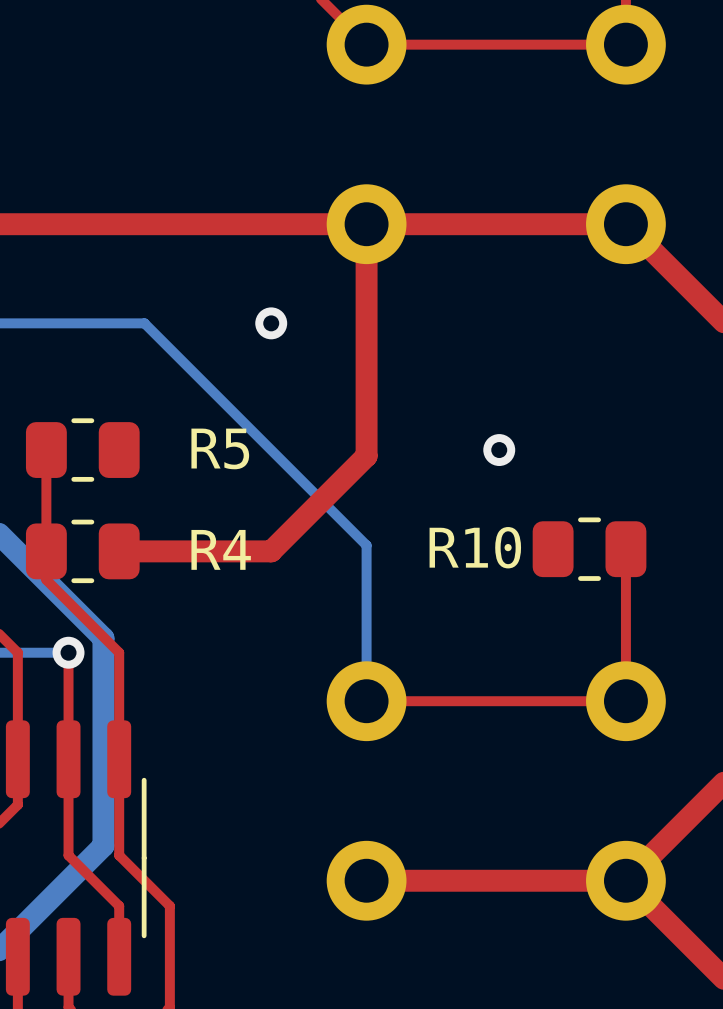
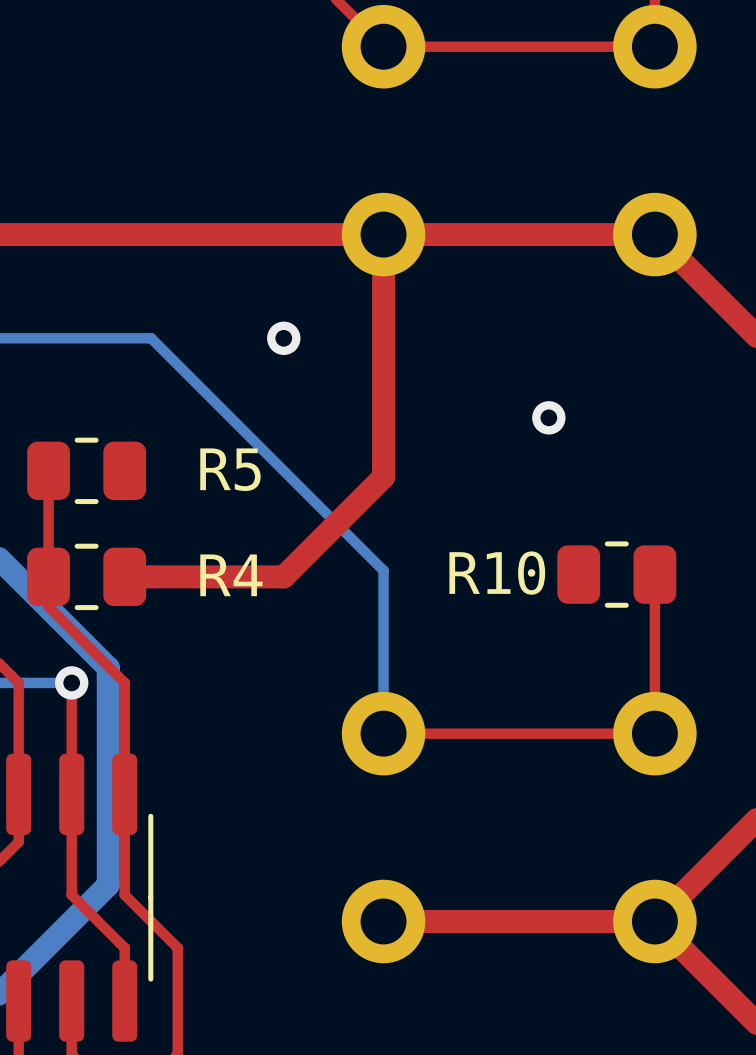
via position: (499, 450) -> (548, 417)

